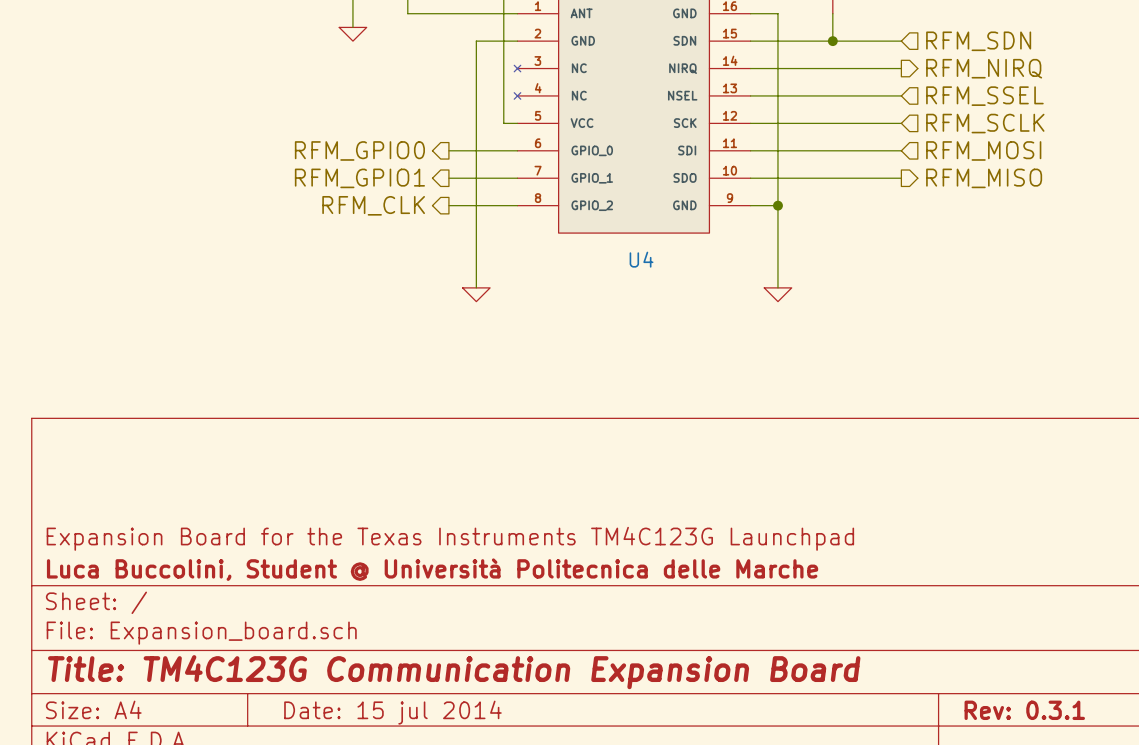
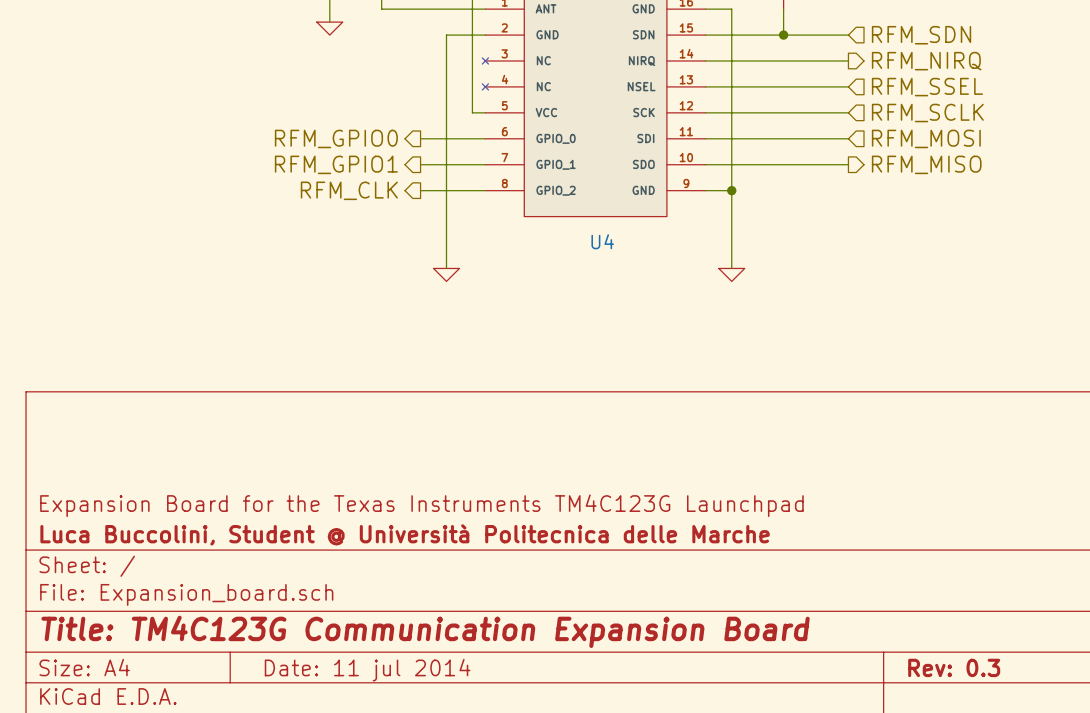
title block: Rev: 0.3.1 (1024, 710) -> Rev: 0.3 (954, 667)
title block: Date: 15 jul 2014 (392, 712) -> Date: 11 jul 2014 (367, 670)

